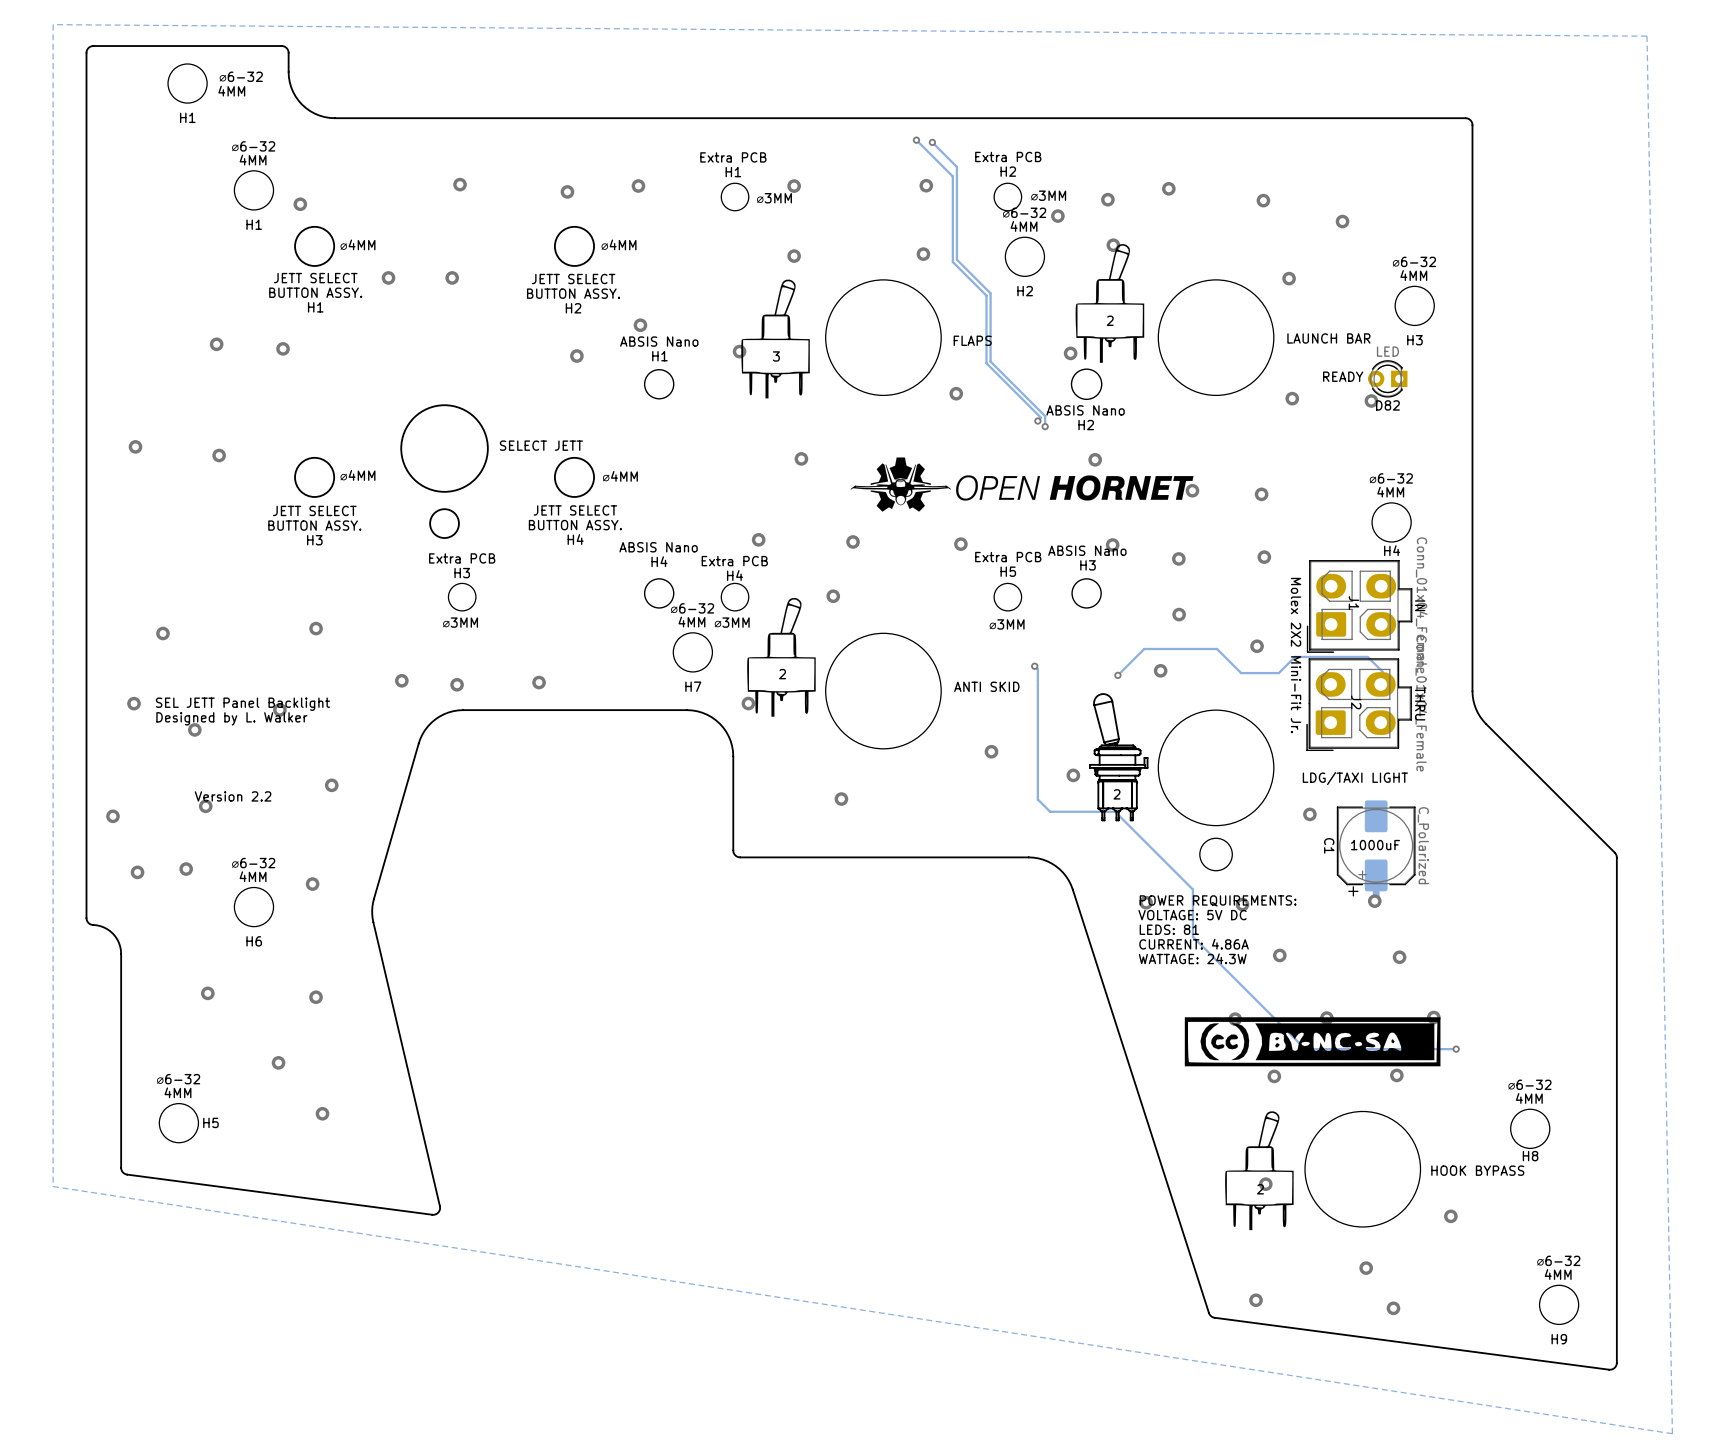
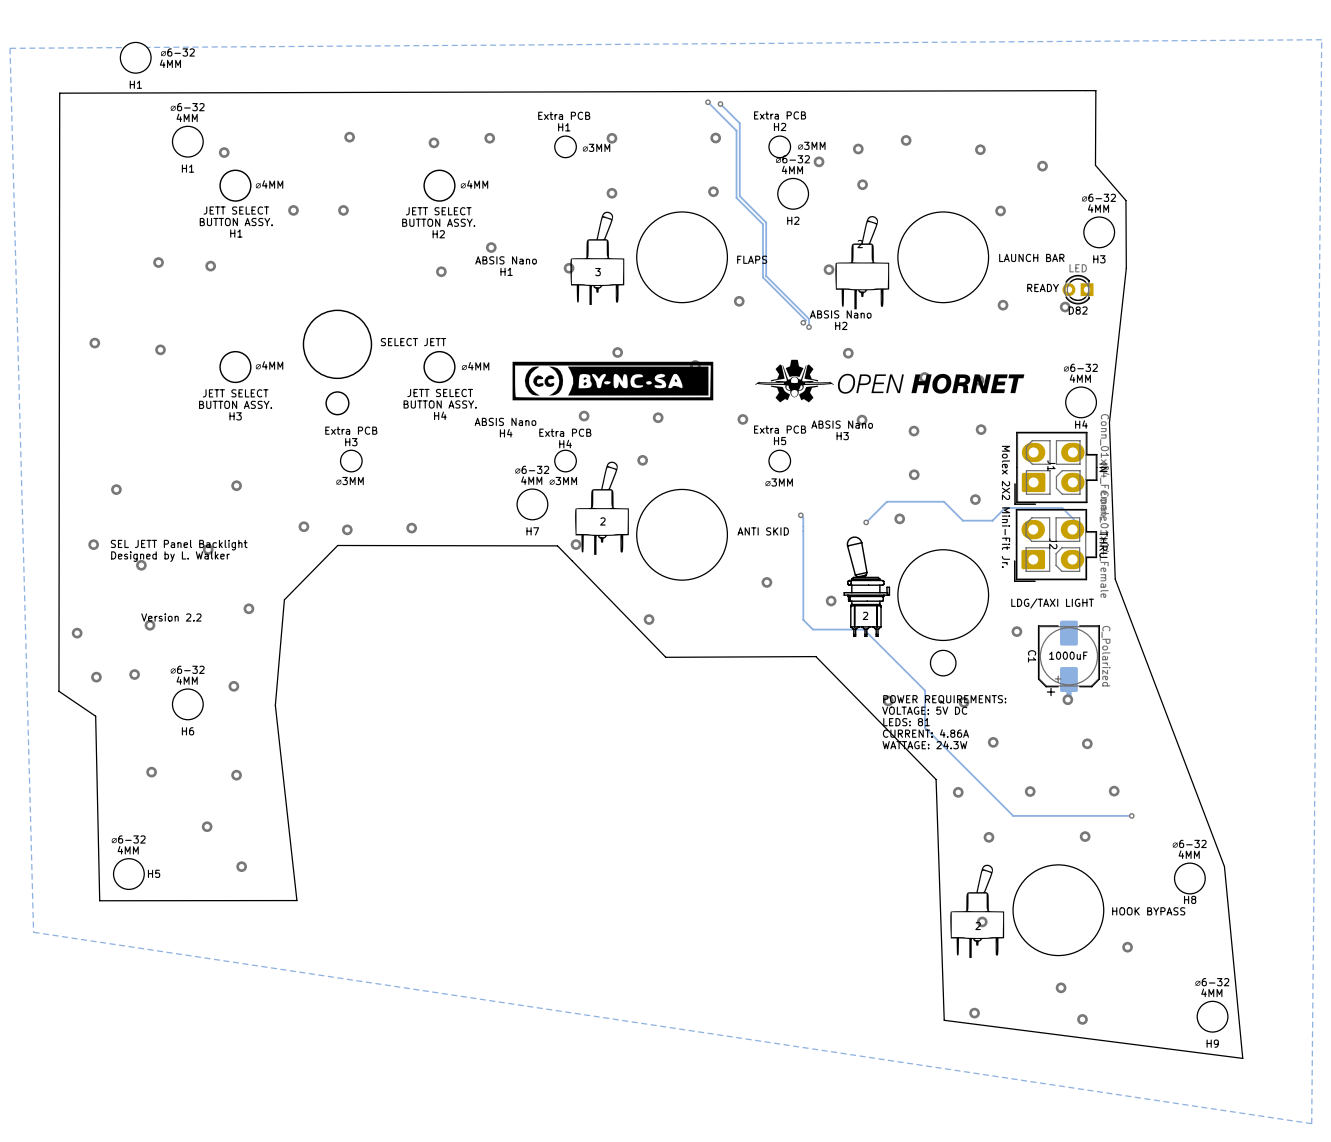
zone outline: (53, 24) (53, 1186) (1672, 1433) (1646, 36) (53, 24) -> (1321, 39) (1311, 1123) (33, 932) (10, 48) (1321, 39)
board edge: (281, 46) (93, 46) (88, 48) (86, 52) (86, 918) (89, 923) (103, 927) (113, 933) (120, 950) (121, 1167) (123, 1172) (432, 1214) (437, 1213) (439, 1206) (372, 914) (373, 898) (422, 734) (435, 719) (443, 714) (458, 710) (692, 710) (702, 712) (715, 720) (726, 731) (730, 741) (733, 756) (733, 850) (737, 856) (1028, 857) (1047, 861) (1063, 872) (1072, 889) (1208, 1313) (1211, 1316) (1609, 1369) (1615, 1367) (1616, 1362) (1616, 855) (1482, 720) (1475, 708) (1472, 695) (1472, 125) (1470, 120) (1465, 118) (329, 117) (310, 111) (295, 96) (288, 77) (288, 51) (281, 46) -> (1095, 90) (1095, 165) (1125, 200) (1126, 268) (1109, 422) (1115, 579) (1224, 866) (1242, 1058) (944, 1020) (936, 779) (815, 656) (665, 657) (557, 545) (337, 545) (284, 599) (275, 705) (296, 900) (99, 900) (95, 716) (58, 691) (59, 93) (1095, 90)
drawing position: (1109, 303) -> (862, 262)
round board edge: [1070, 368, 1103, 401] -> none
round board edge: [643, 369, 675, 400] -> none
drawing: none -> [512, 361, 714, 401]
drawing position: (1022, 484) -> (889, 381)
round board edge: [643, 578, 675, 609] -> none
round board edge: [1071, 578, 1102, 609] -> none
drawing: [1184, 1017, 1441, 1067] -> none

